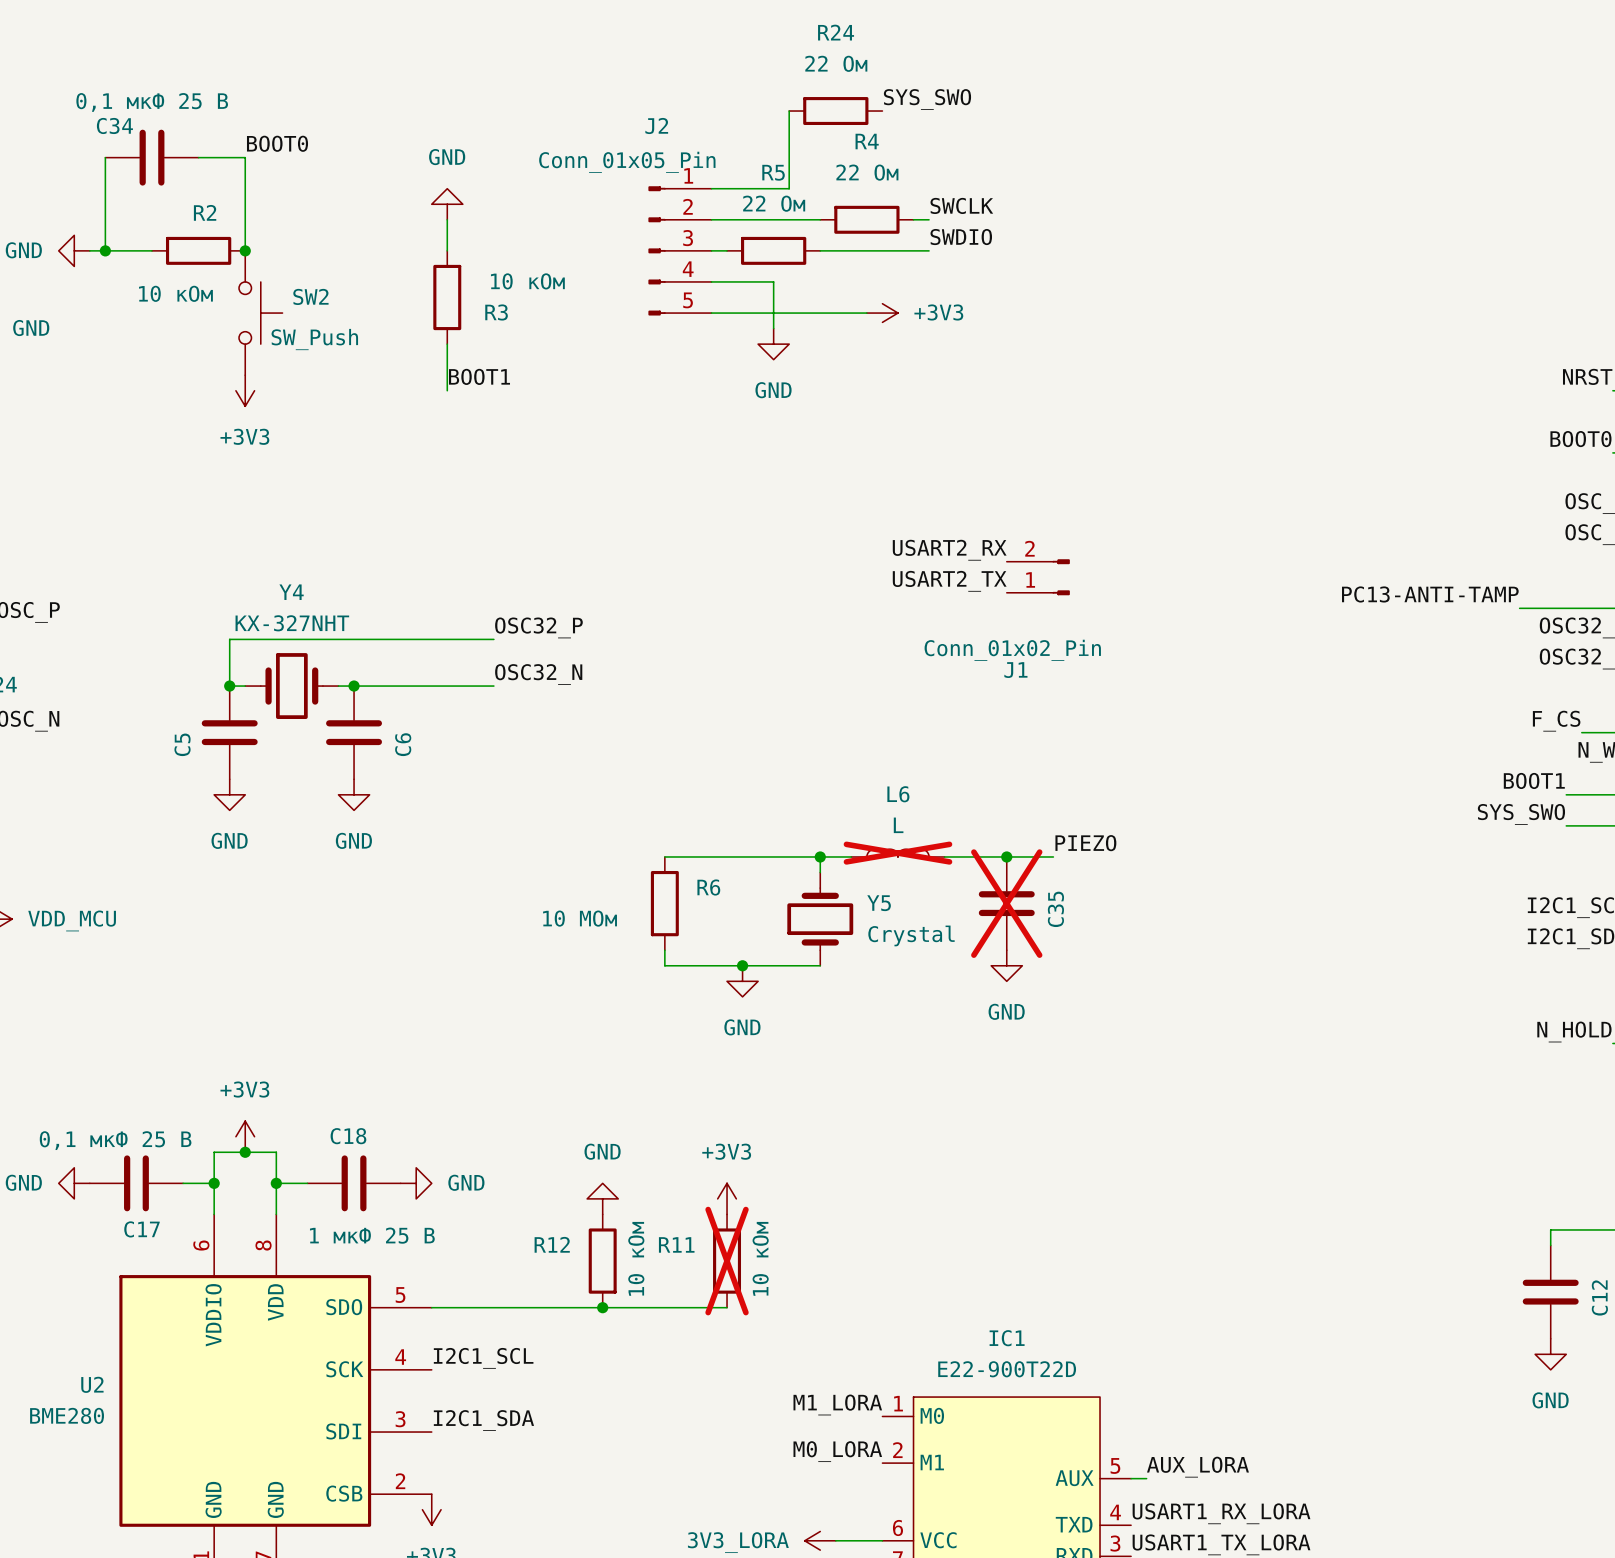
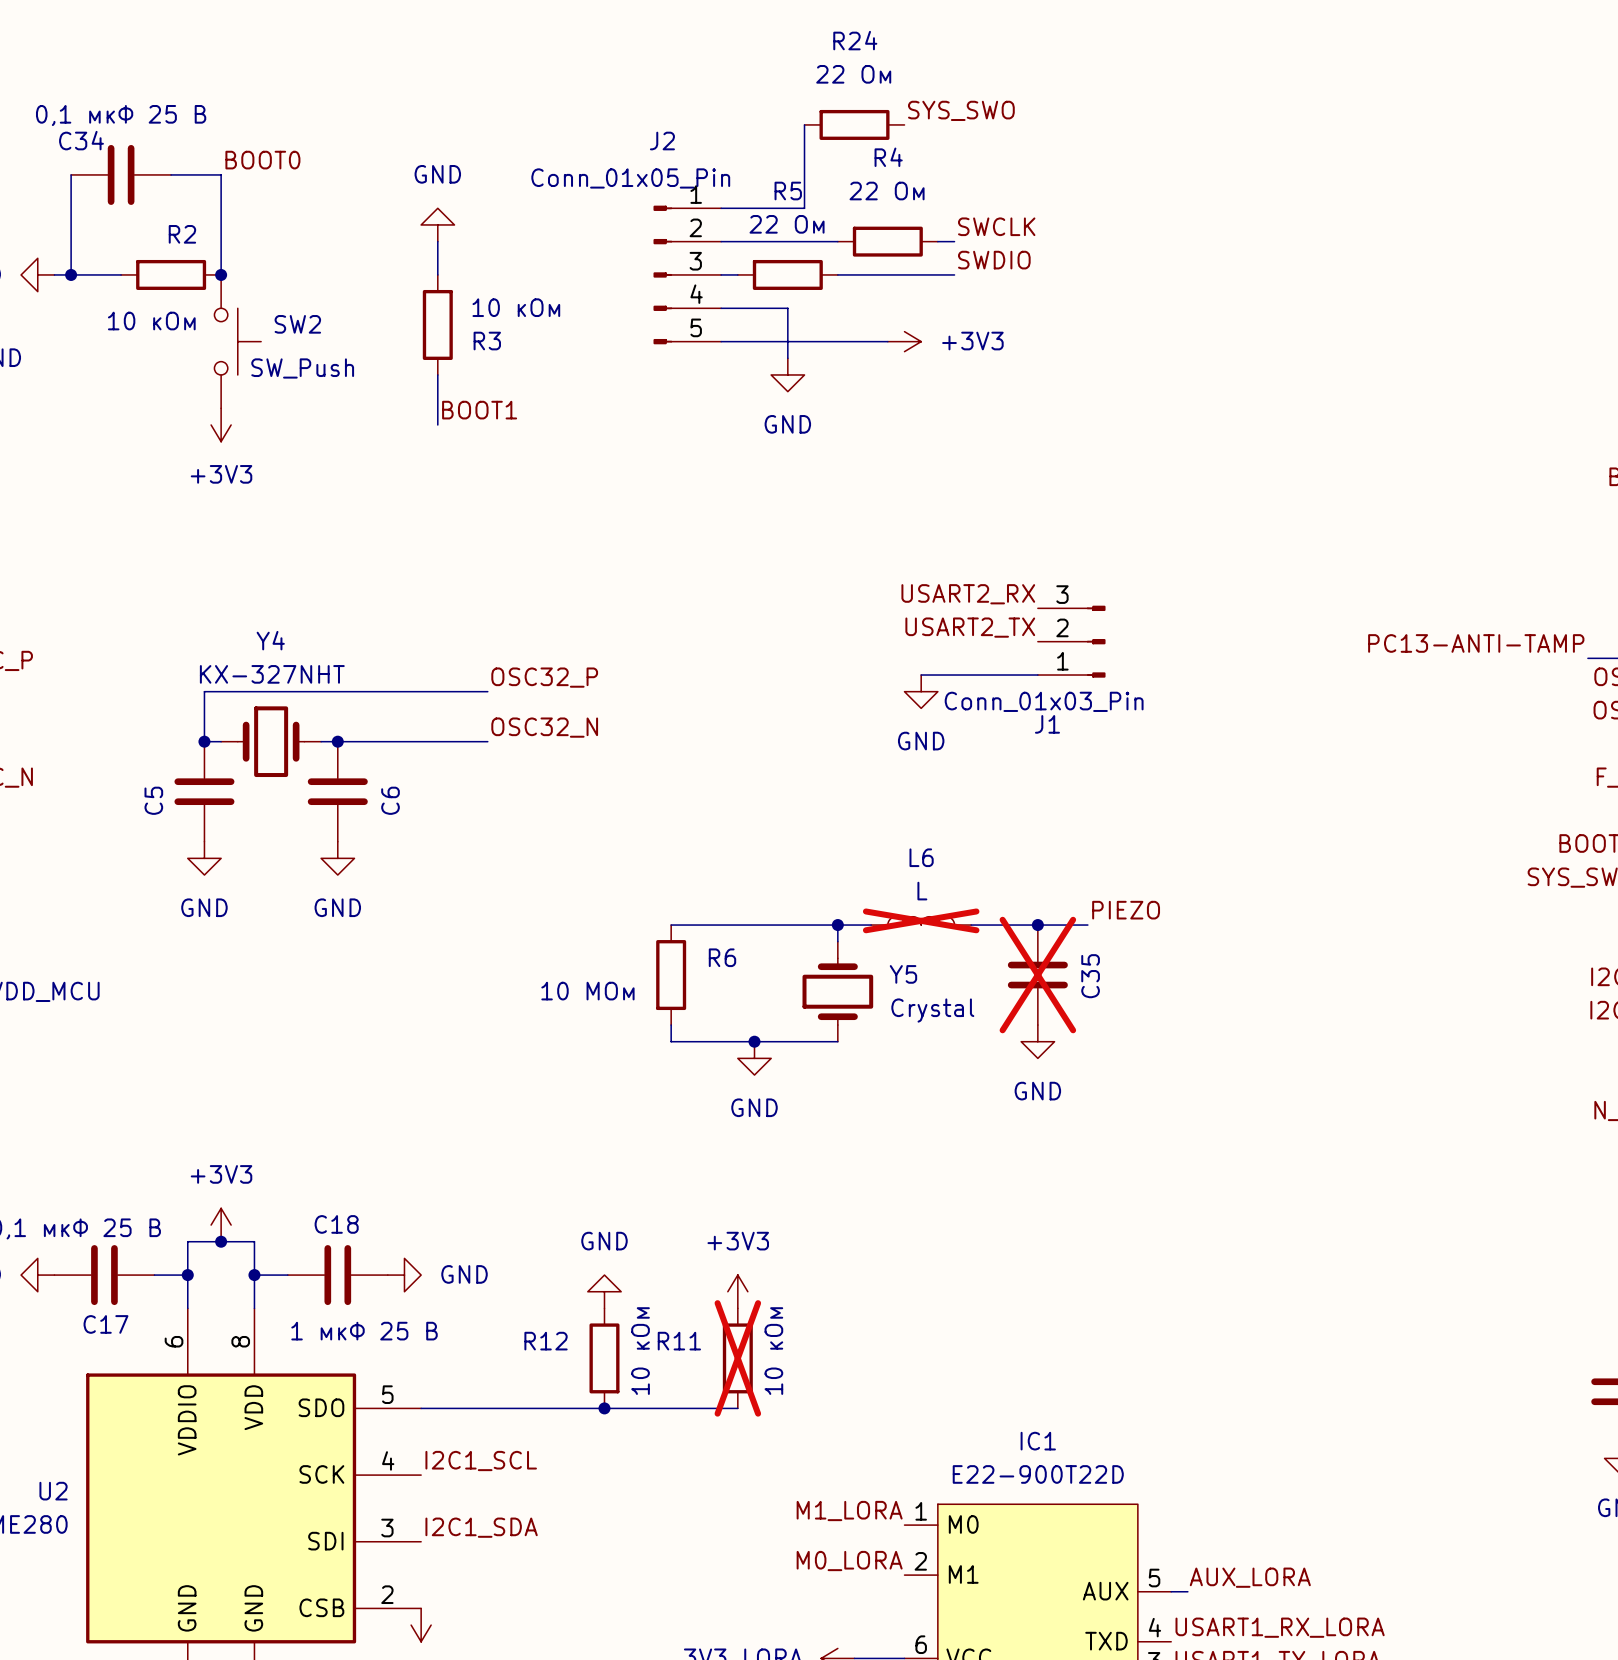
J1 symbol: [1006, 559, 1070, 596] -> [1037, 605, 1106, 678]
wire: none -> (921, 675) (1037, 675)
power symbol: none -> GND (921, 691)
J1 value: Conn_01x02_Pin (1012, 650) -> Conn_01x03_Pin (1044, 701)

